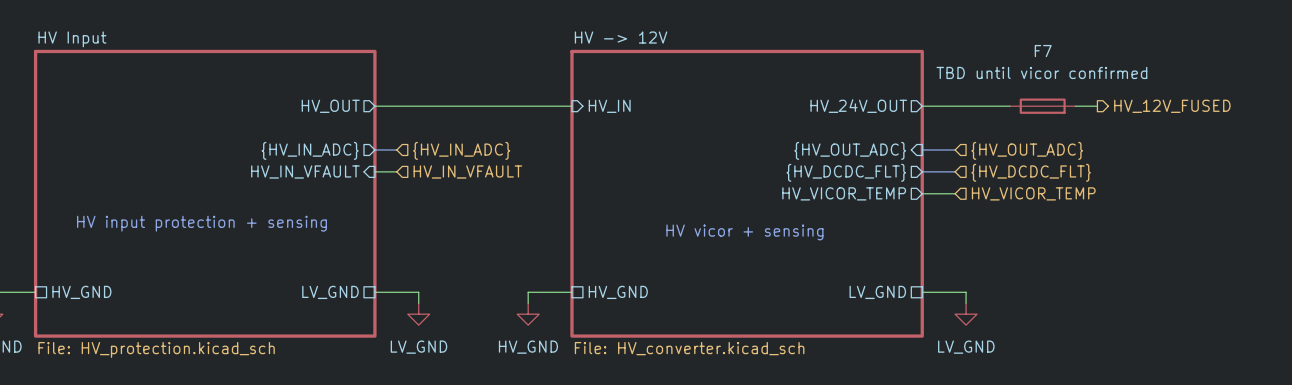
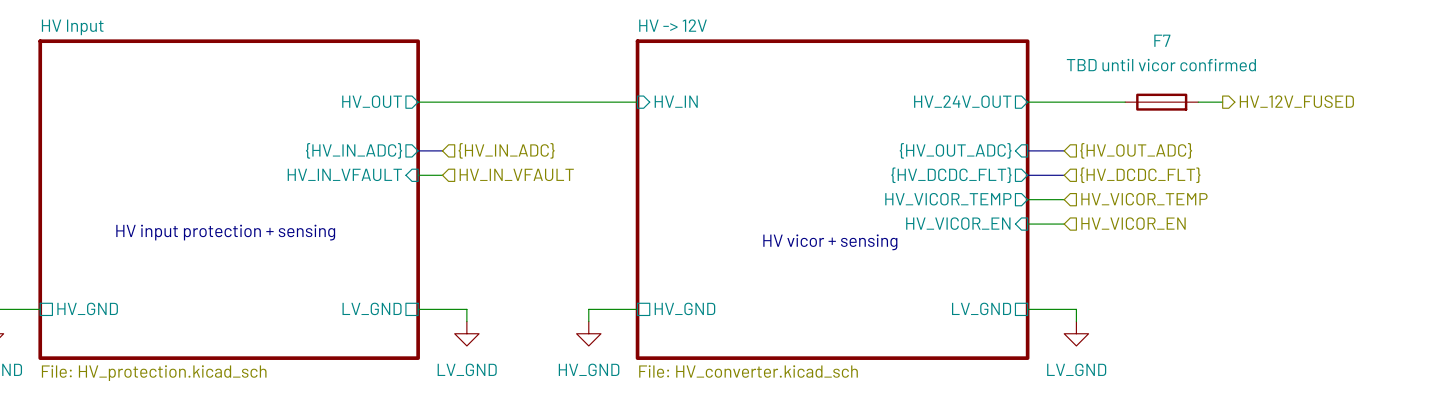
sheet pin: none -> HV_VICOR_EN (958, 223)
wire: none -> (1027, 224) (1064, 224)
hierarchical label: none -> HV_VICOR_EN (1133, 223)

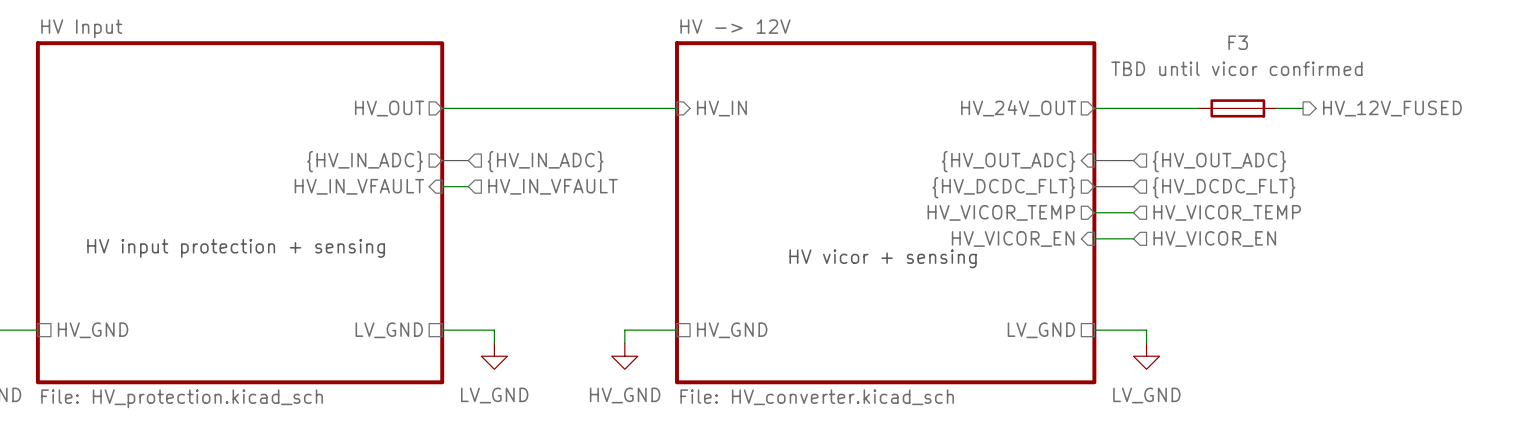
F7 name: F7 (1162, 40) -> F3 (1238, 42)

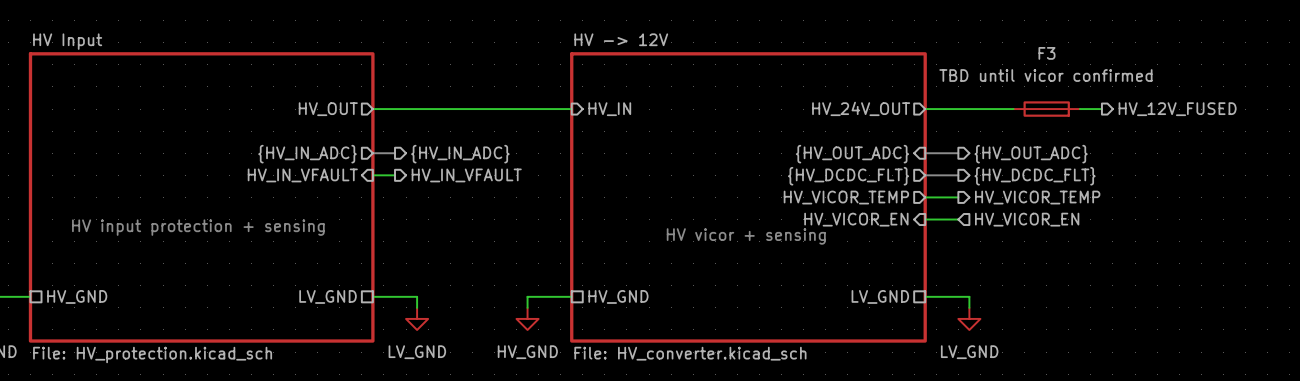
hierarchical label shape: input (545, 161) -> output (460, 154)
hierarchical label shape: input (1219, 161) -> output (1031, 154)
hierarchical label shape: input (552, 186) -> output (466, 175)
hierarchical label shape: input (1224, 187) -> output (1035, 176)
hierarchical label shape: input (1227, 212) -> output (1037, 197)

